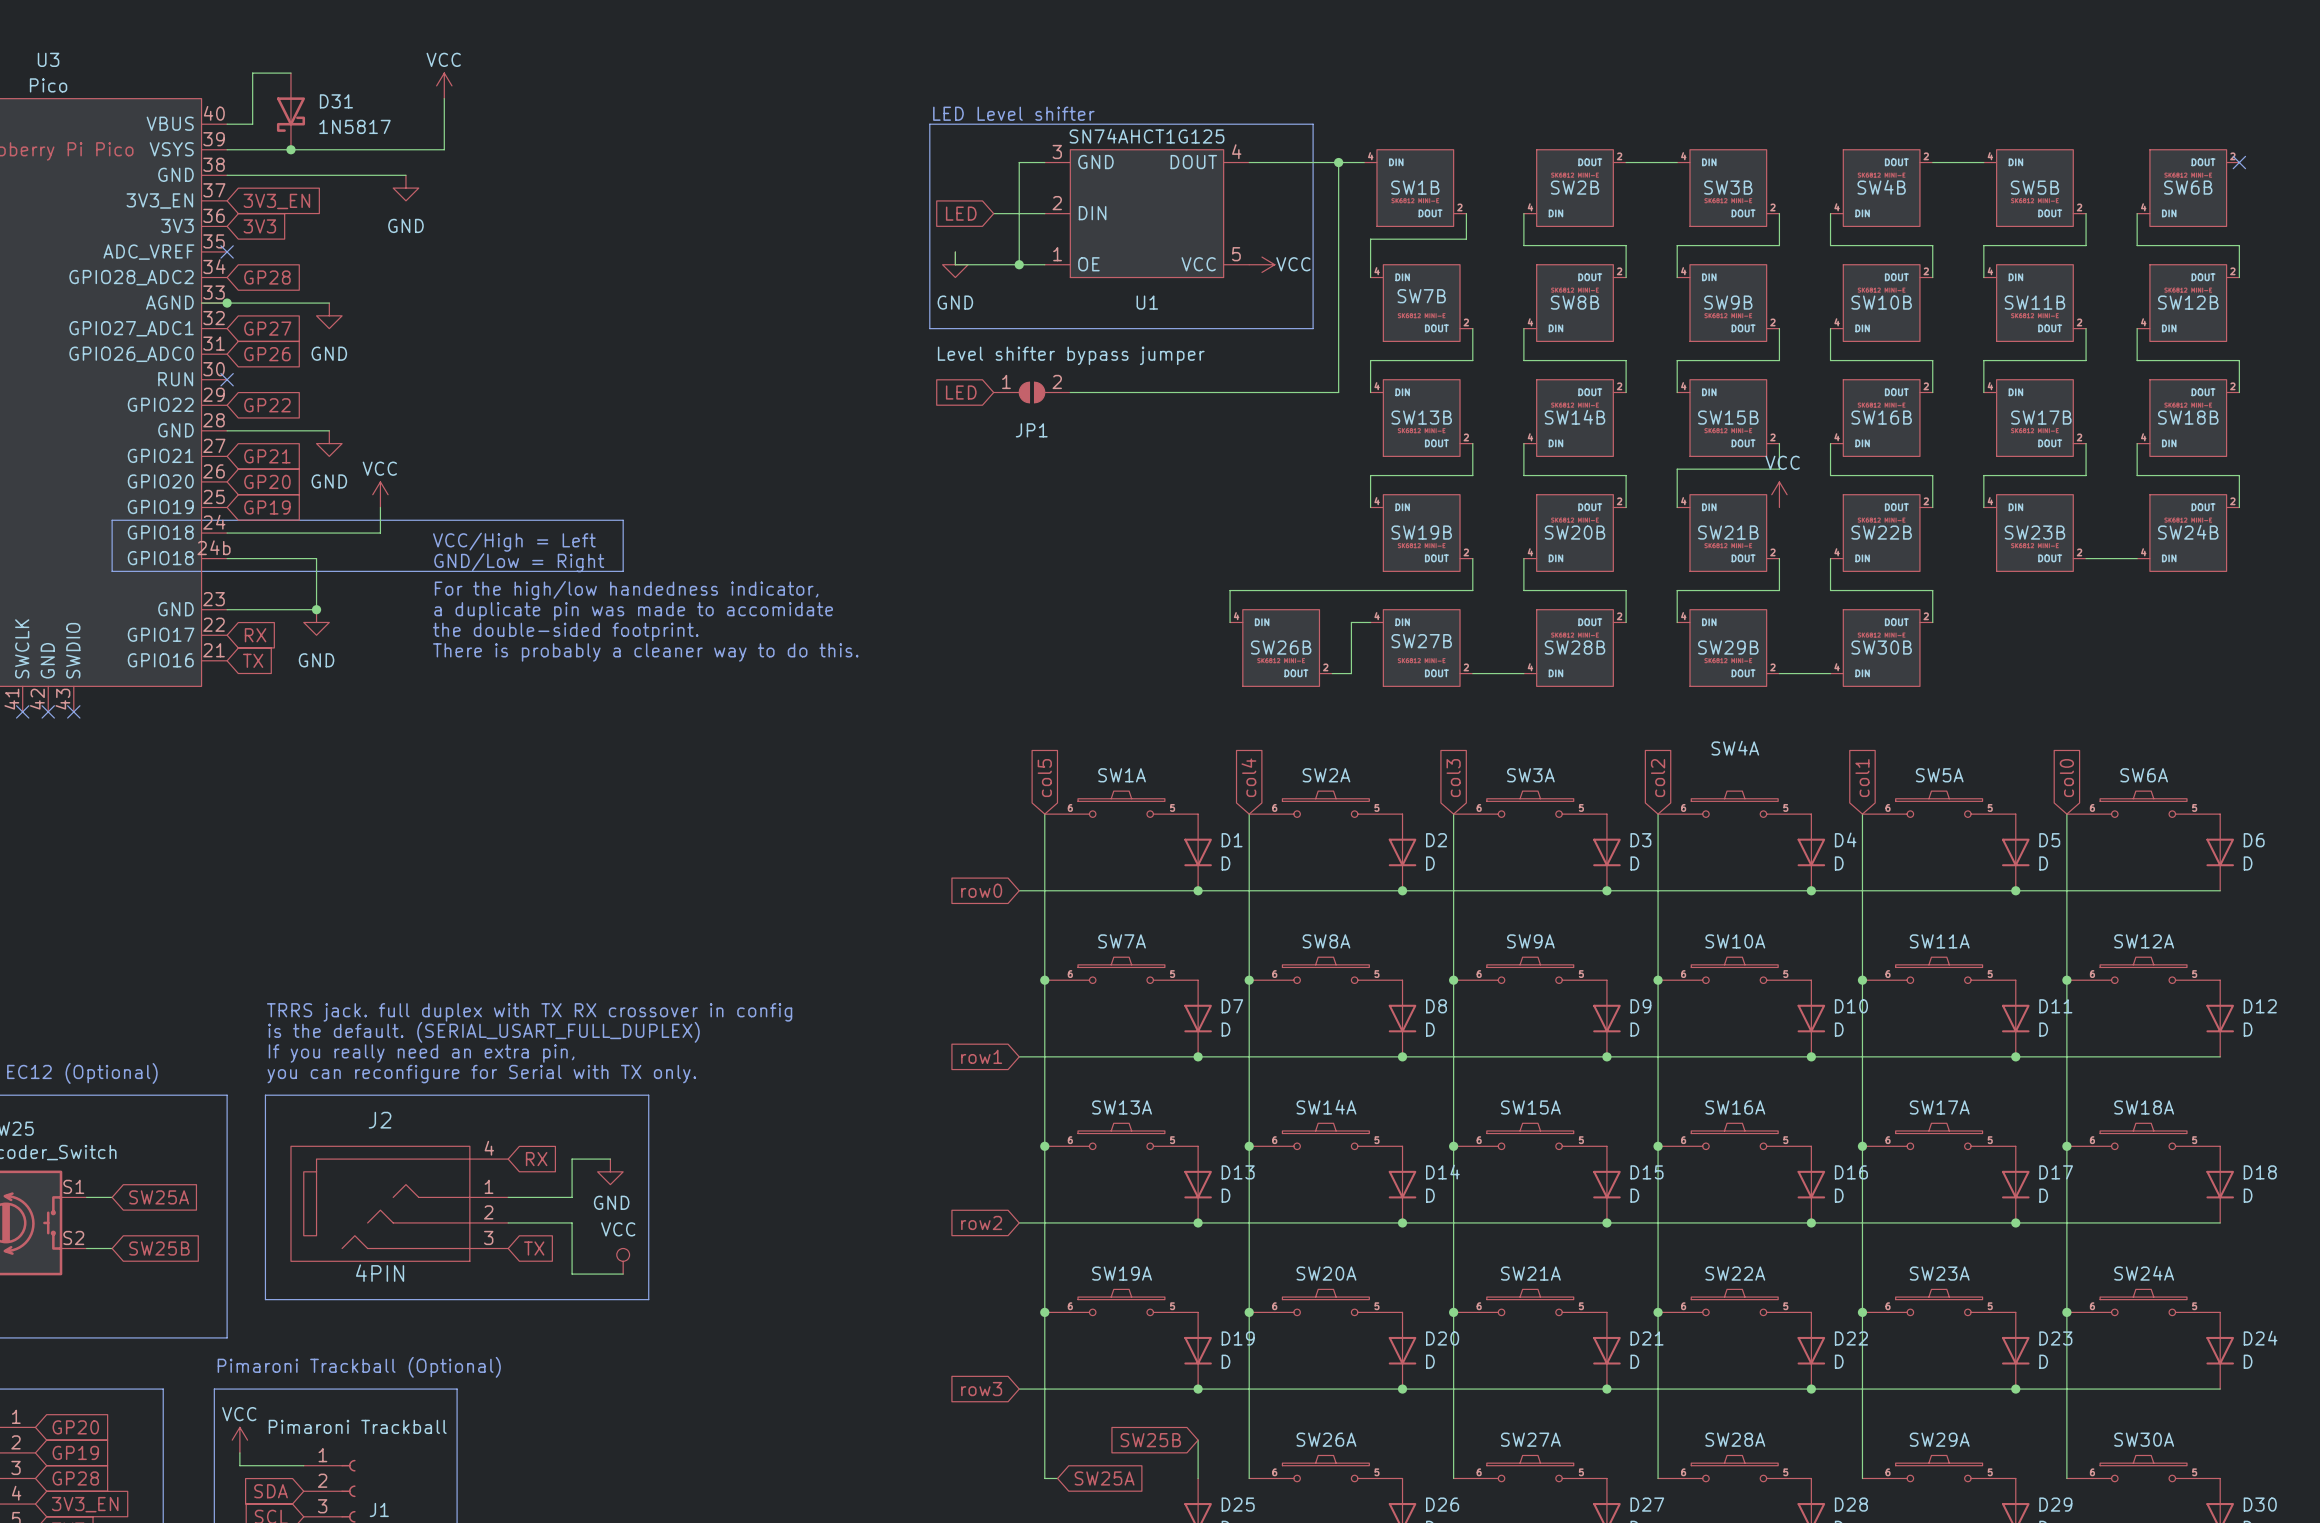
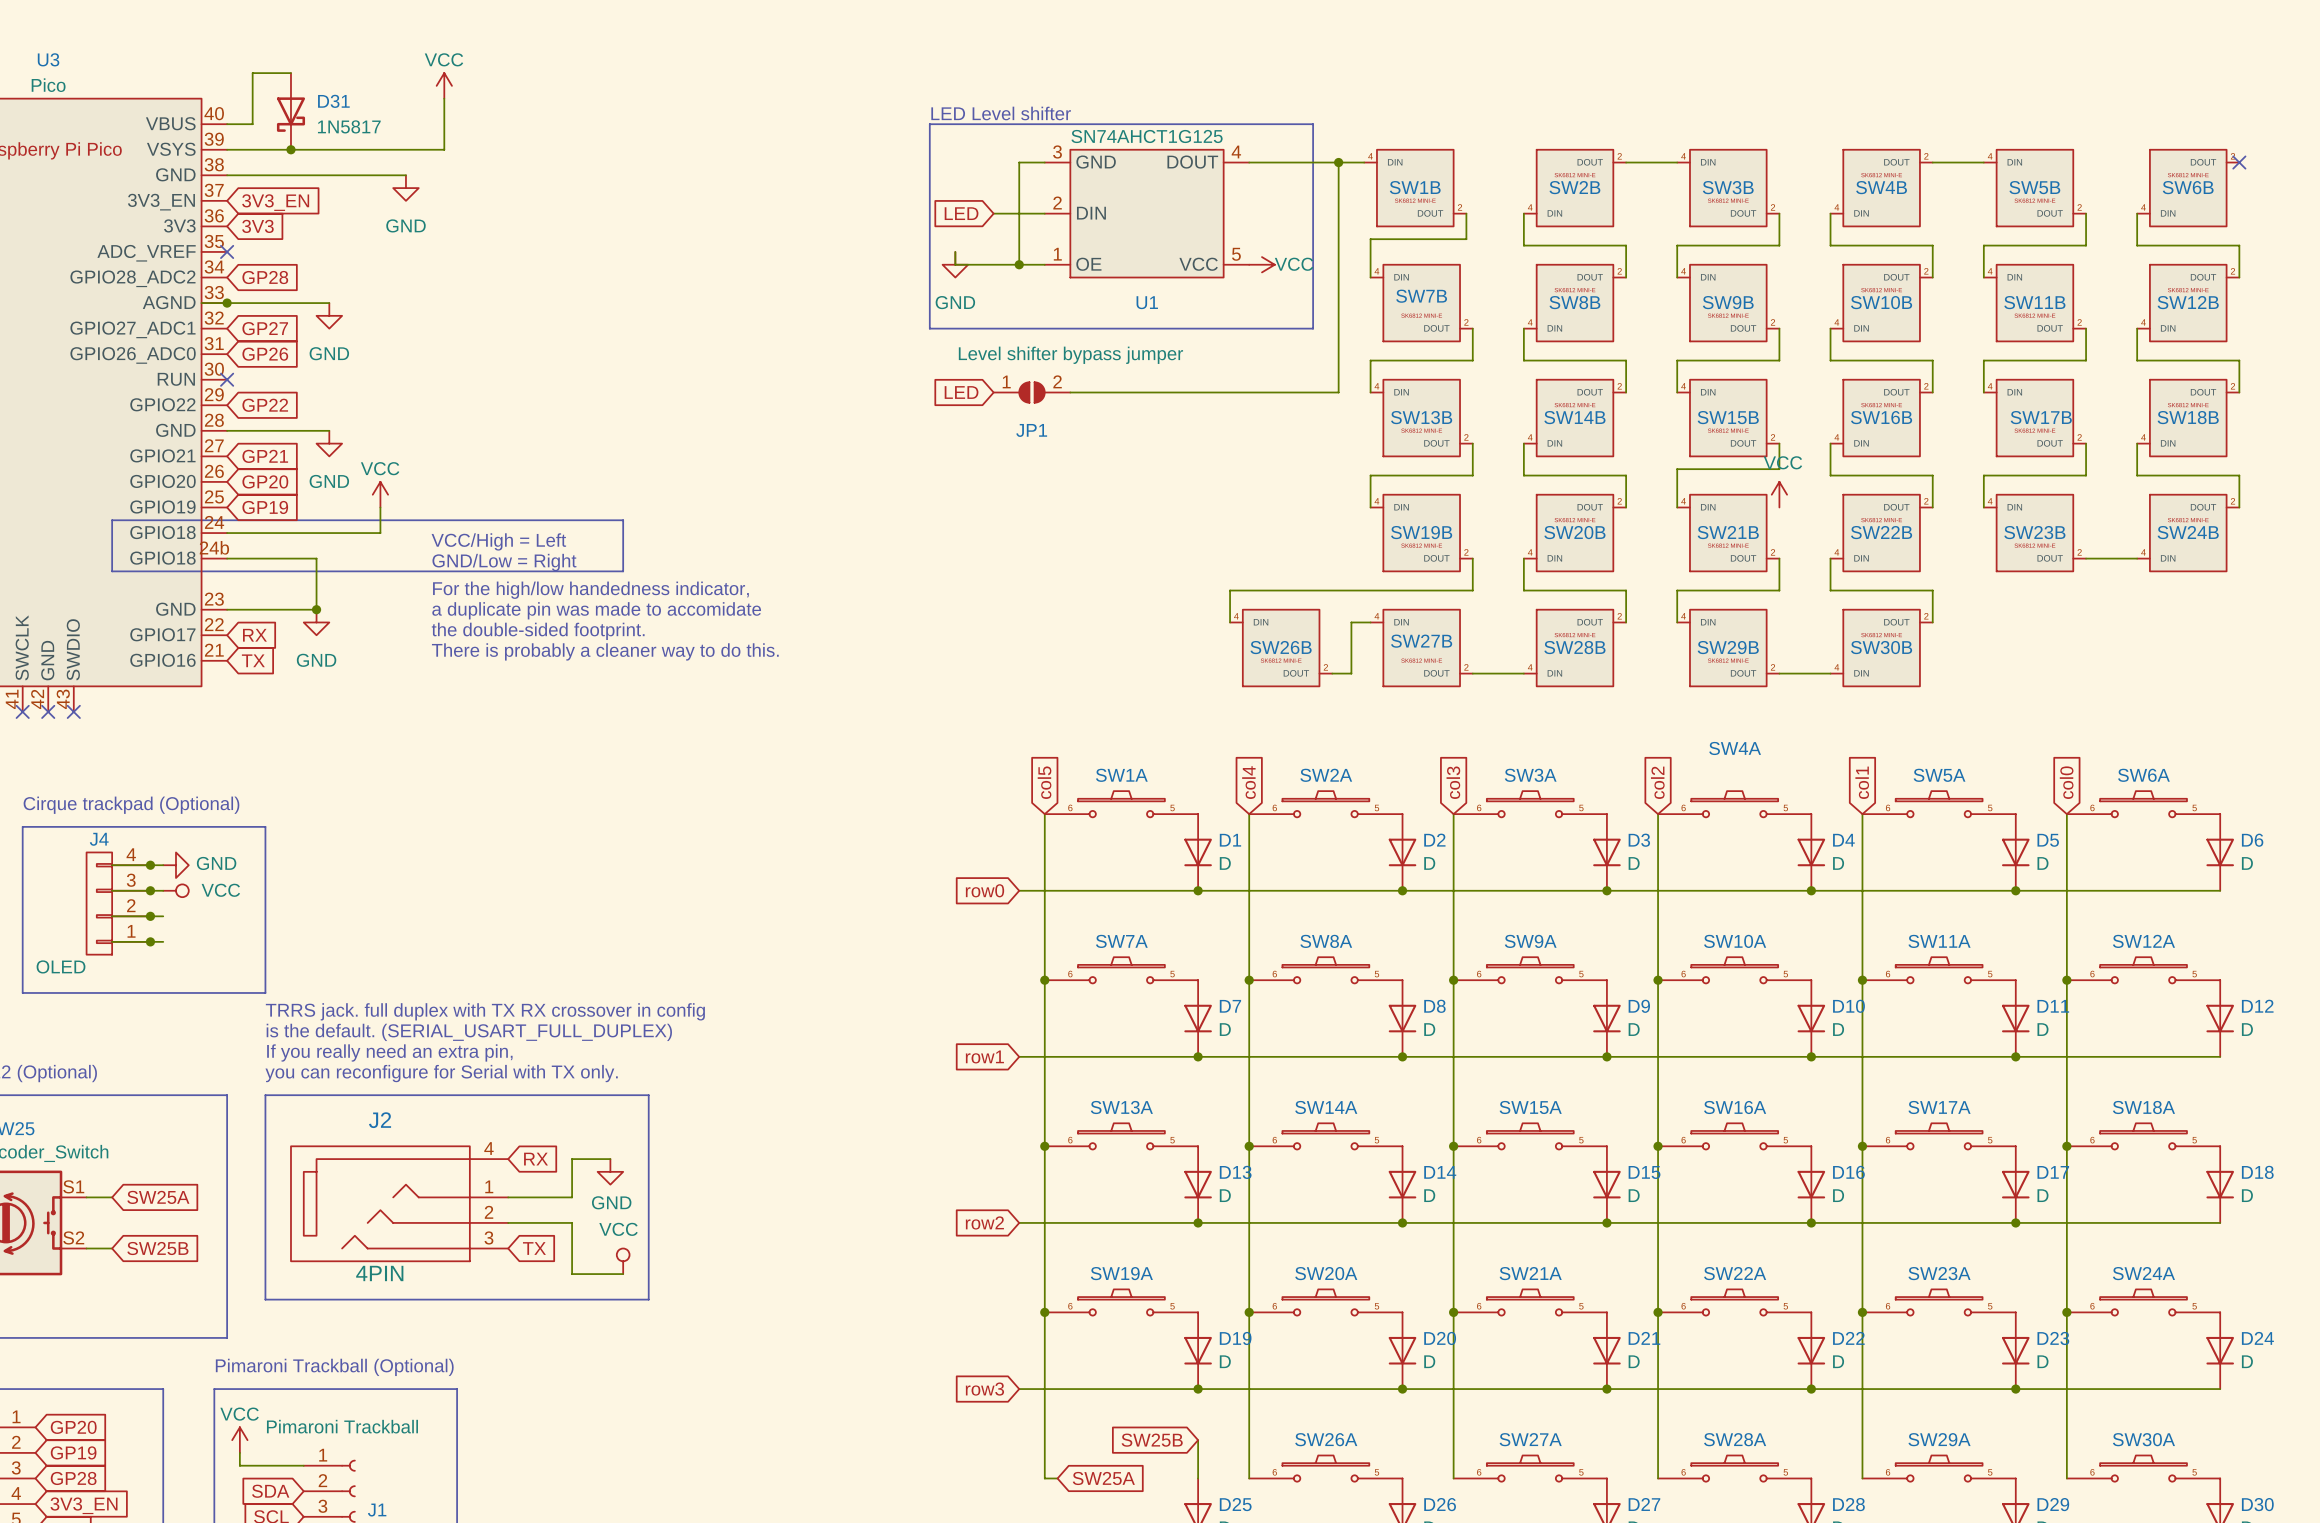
text: none -> Cirque trackpad (Optional) (131, 805)
line: none -> (22, 826) (265, 826) (265, 992) (22, 992) (22, 826)
wire: none -> (112, 865) (163, 865)
junction: none -> (150, 865)
power symbol: none -> GND (176, 865)
wire: none -> (112, 890) (163, 890)
junction: none -> (150, 890)
power symbol: none -> VCC (176, 890)
J4: none -> OLED (118, 903)
wire: none -> (112, 916) (163, 916)
junction: none -> (150, 916)
wire: none -> (112, 941) (163, 941)
junction: none -> (150, 941)

